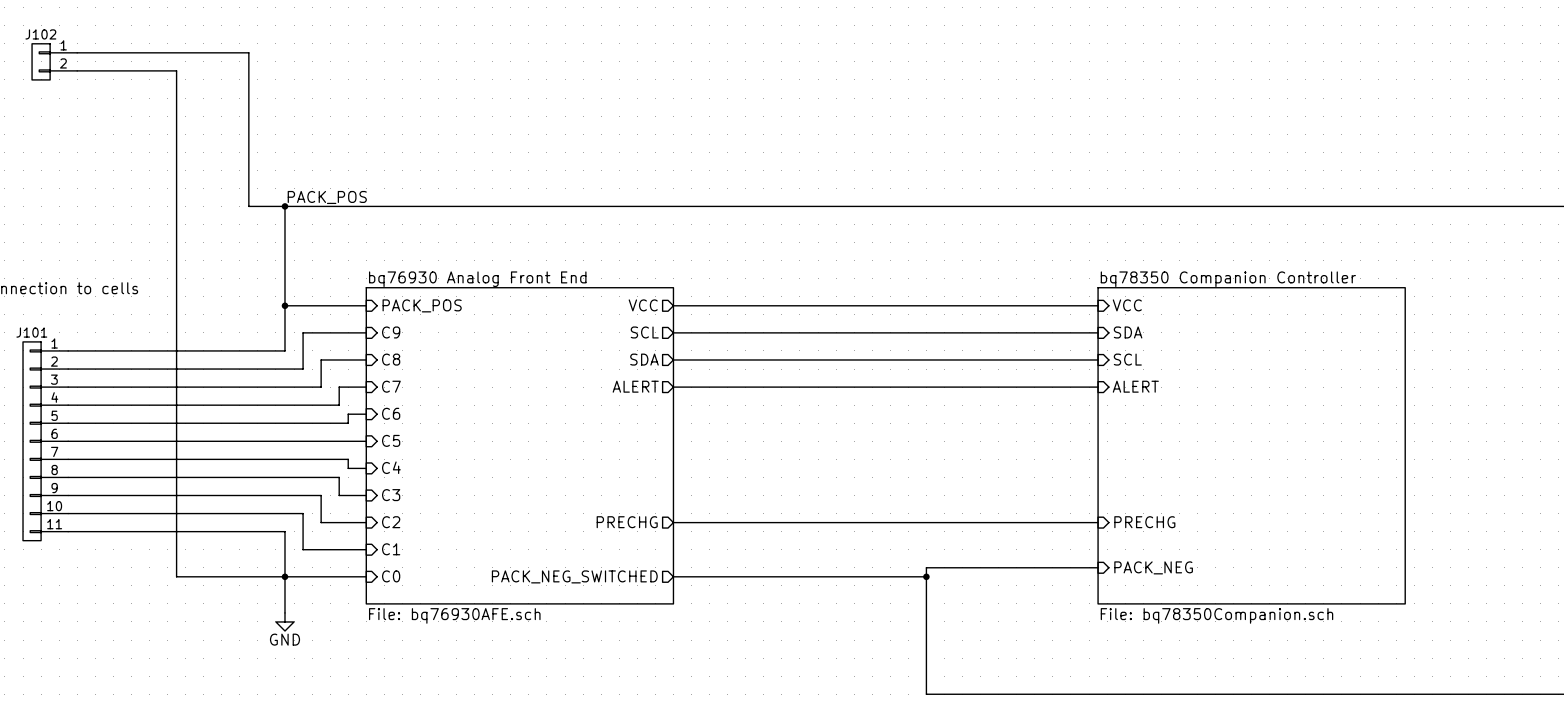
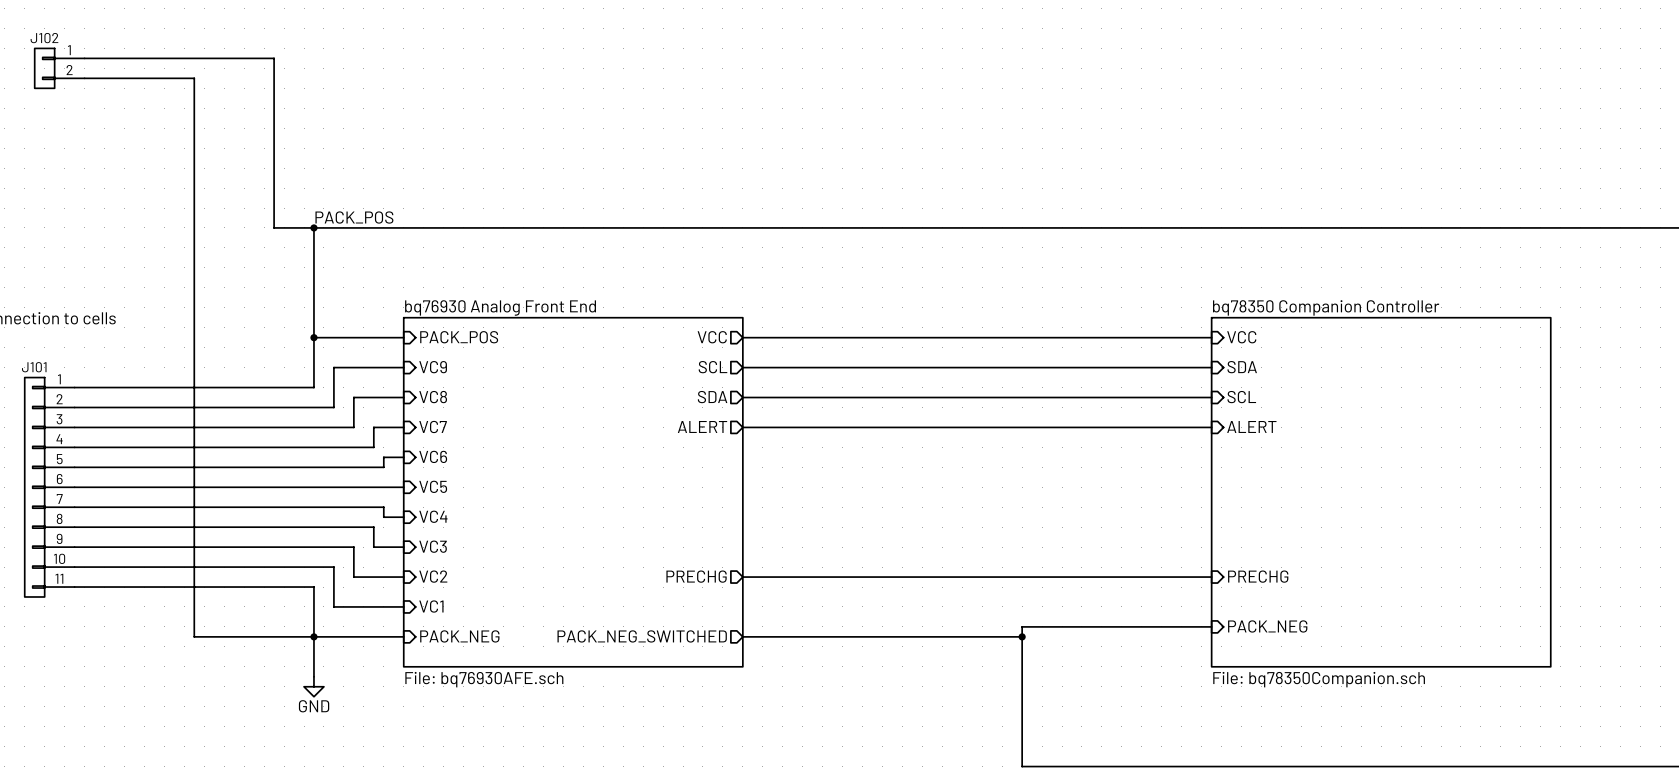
sheet pin: C9 (391, 332) -> VC9 (433, 367)
sheet pin: C8 (391, 359) -> VC8 (433, 397)
sheet pin: C7 (391, 386) -> VC7 (433, 426)
sheet pin: C6 (391, 413) -> VC6 (433, 456)
sheet pin: C5 (391, 440) -> VC5 (433, 486)
sheet pin: C4 (391, 467) -> VC4 (433, 516)
sheet pin: C3 (391, 495) -> VC3 (433, 546)
sheet pin: C2 (391, 522) -> VC2 (433, 576)
sheet pin: C1 (391, 549) -> VC1 (431, 606)
sheet pin: C0 (391, 576) -> PACK_NEG (459, 636)

